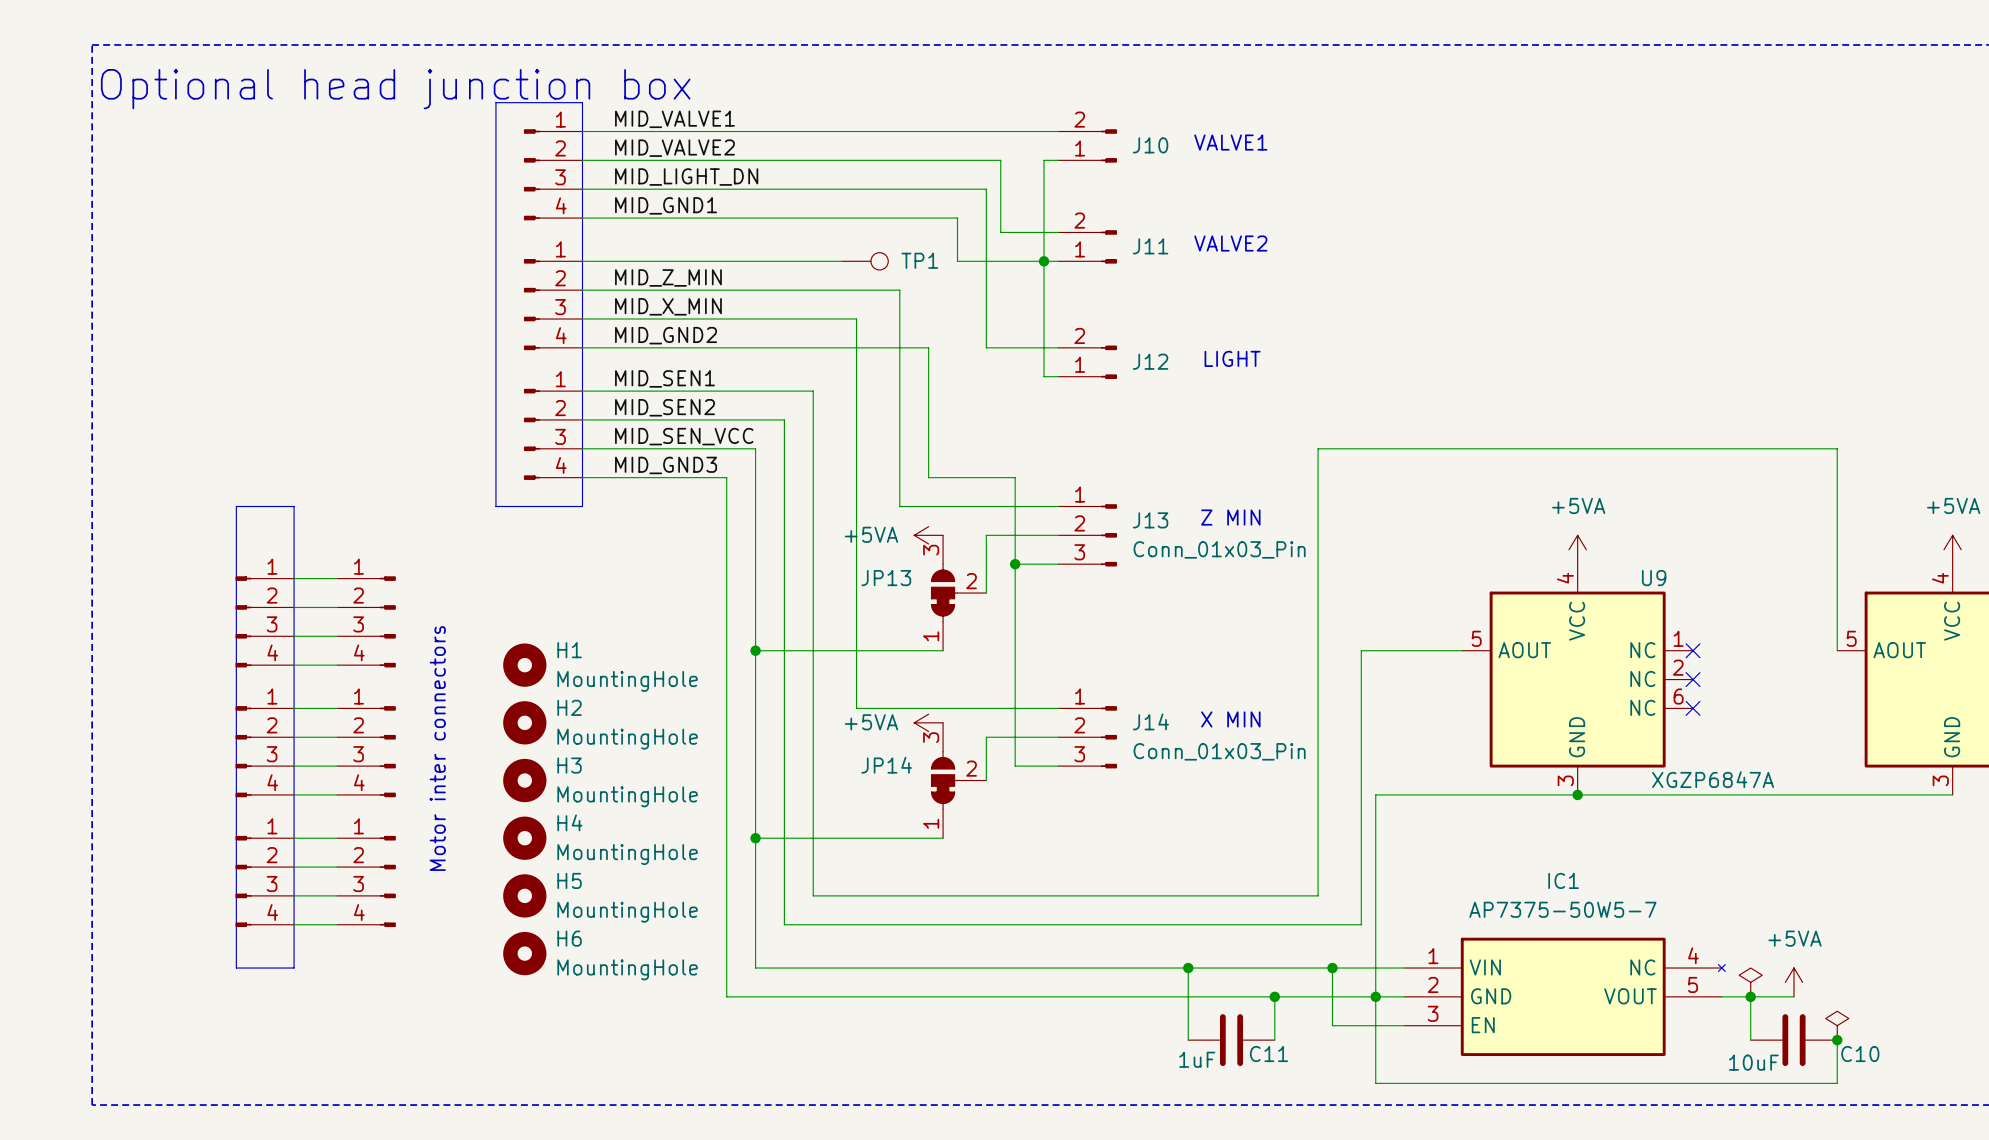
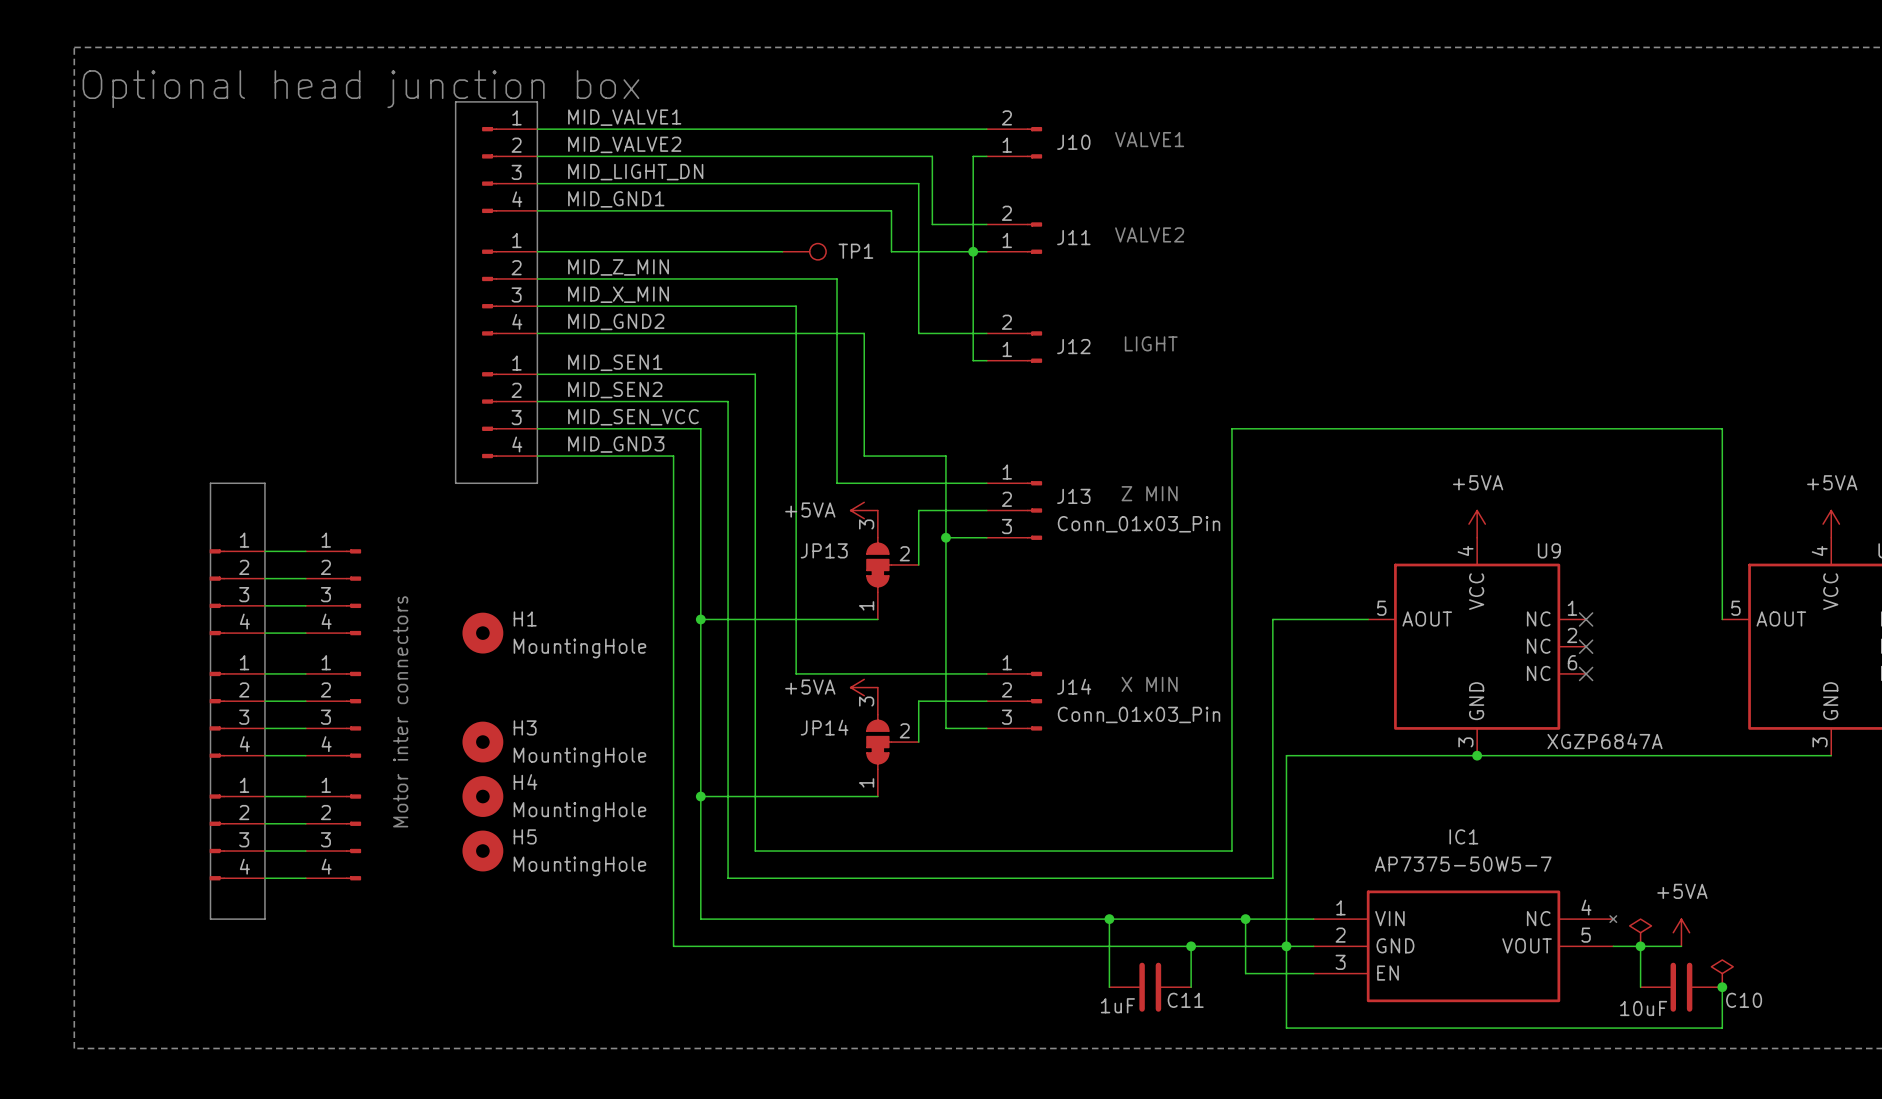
H2: MountingHole (524, 722) -> none
H6: MountingHole (524, 953) -> none

